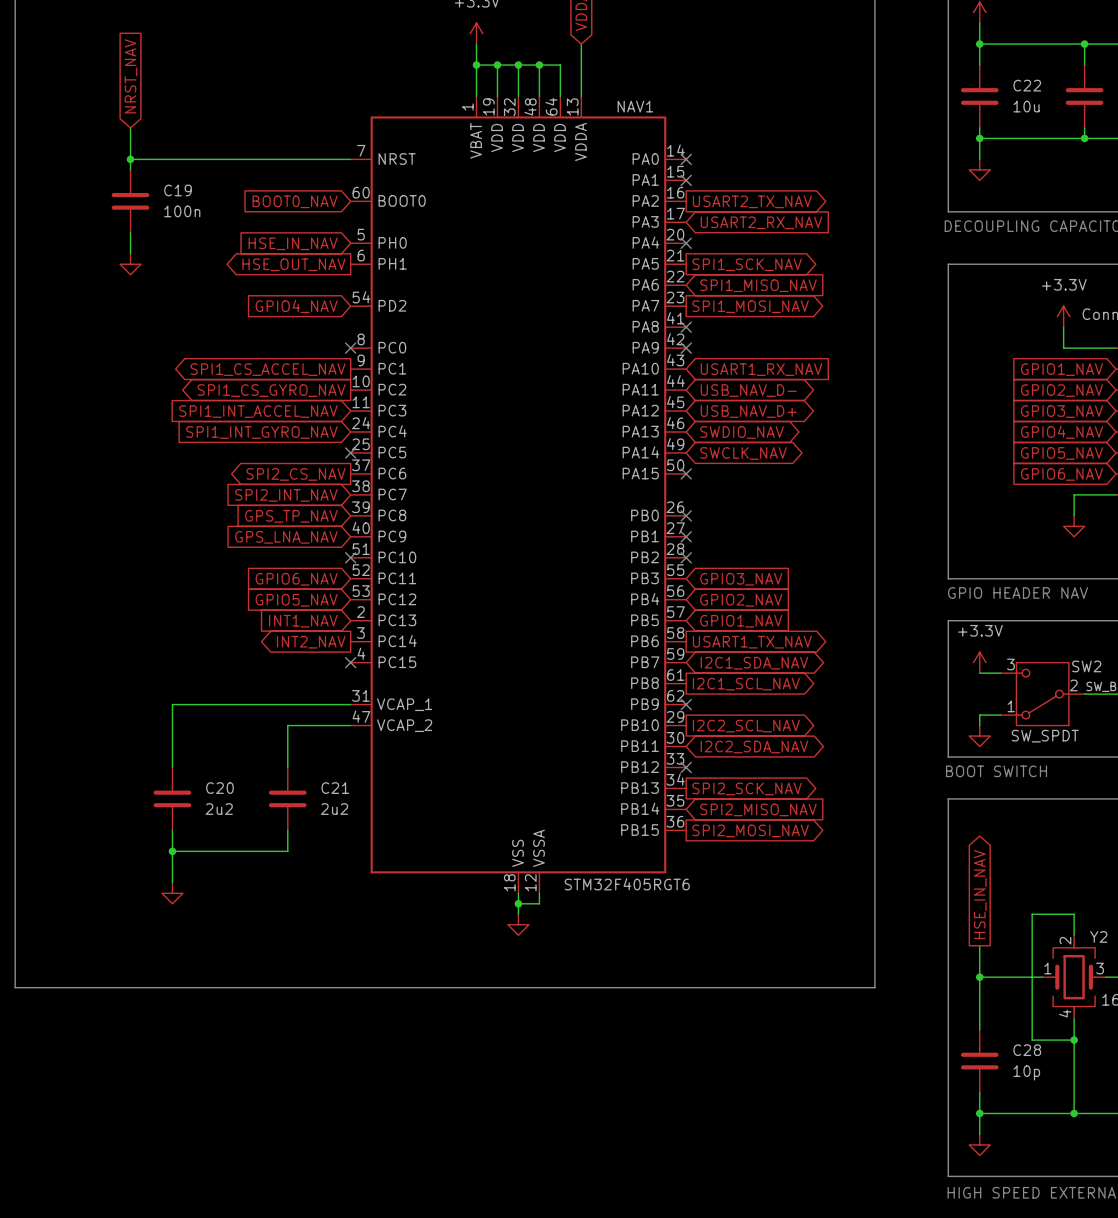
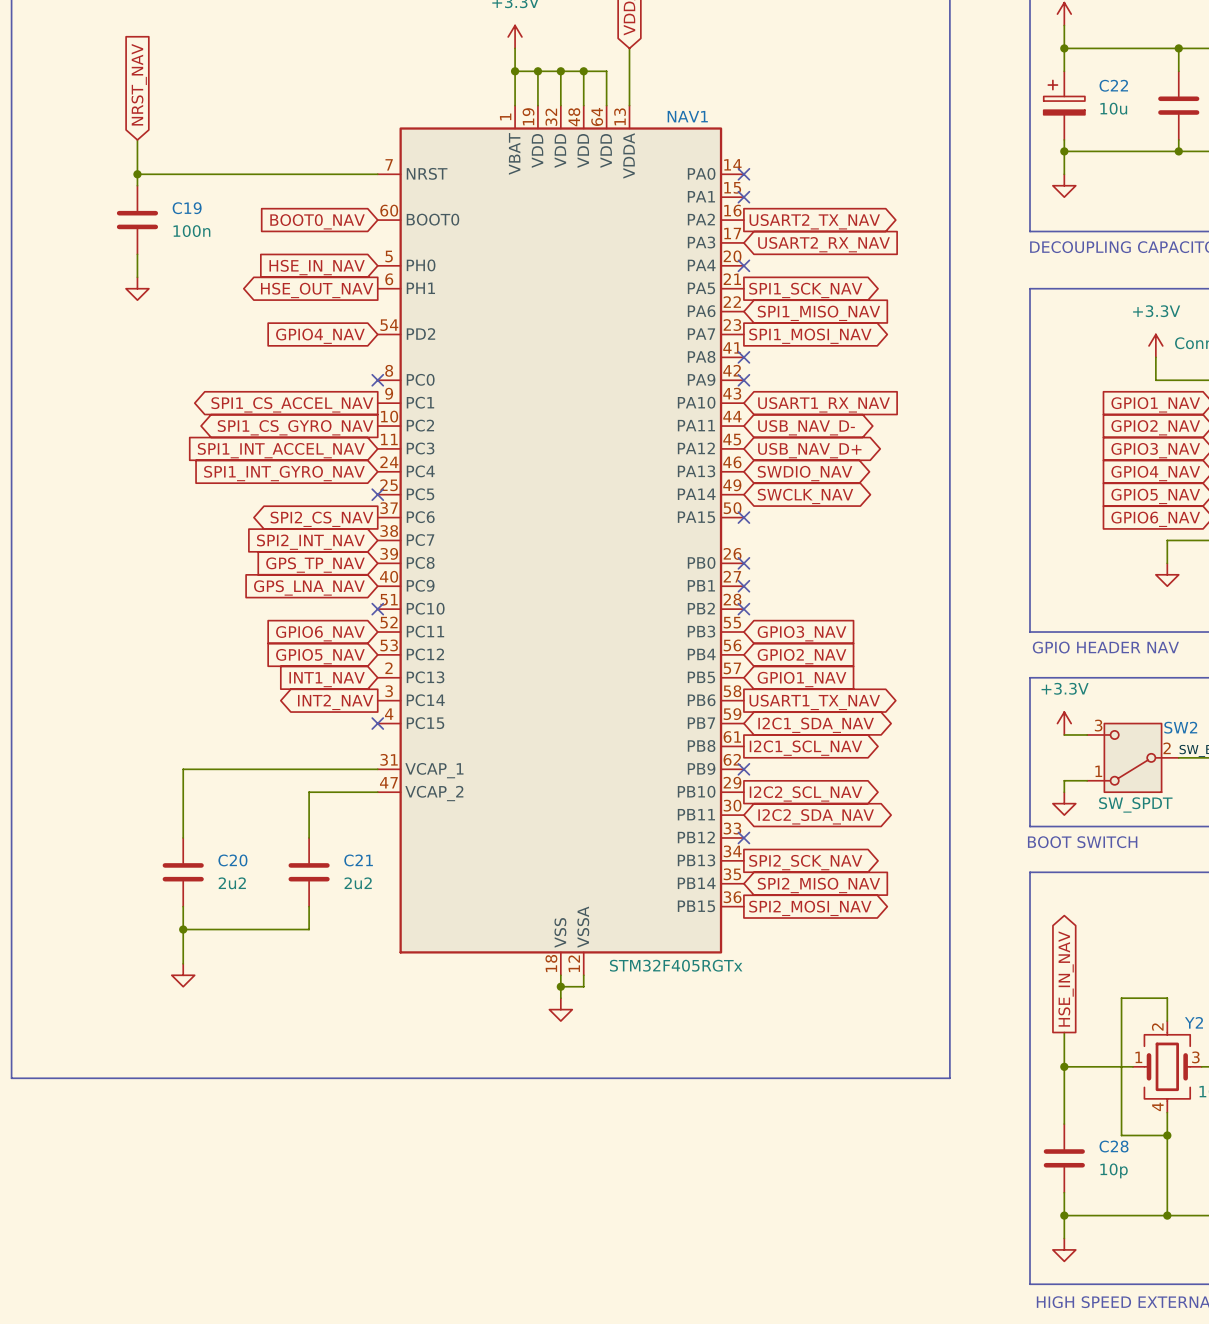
C22 symbol: [960, 65, 999, 128] -> [1043, 71, 1085, 140]
NAV1 value: STM32F405RGT6 (627, 884) -> STM32F405RGTx (676, 965)

